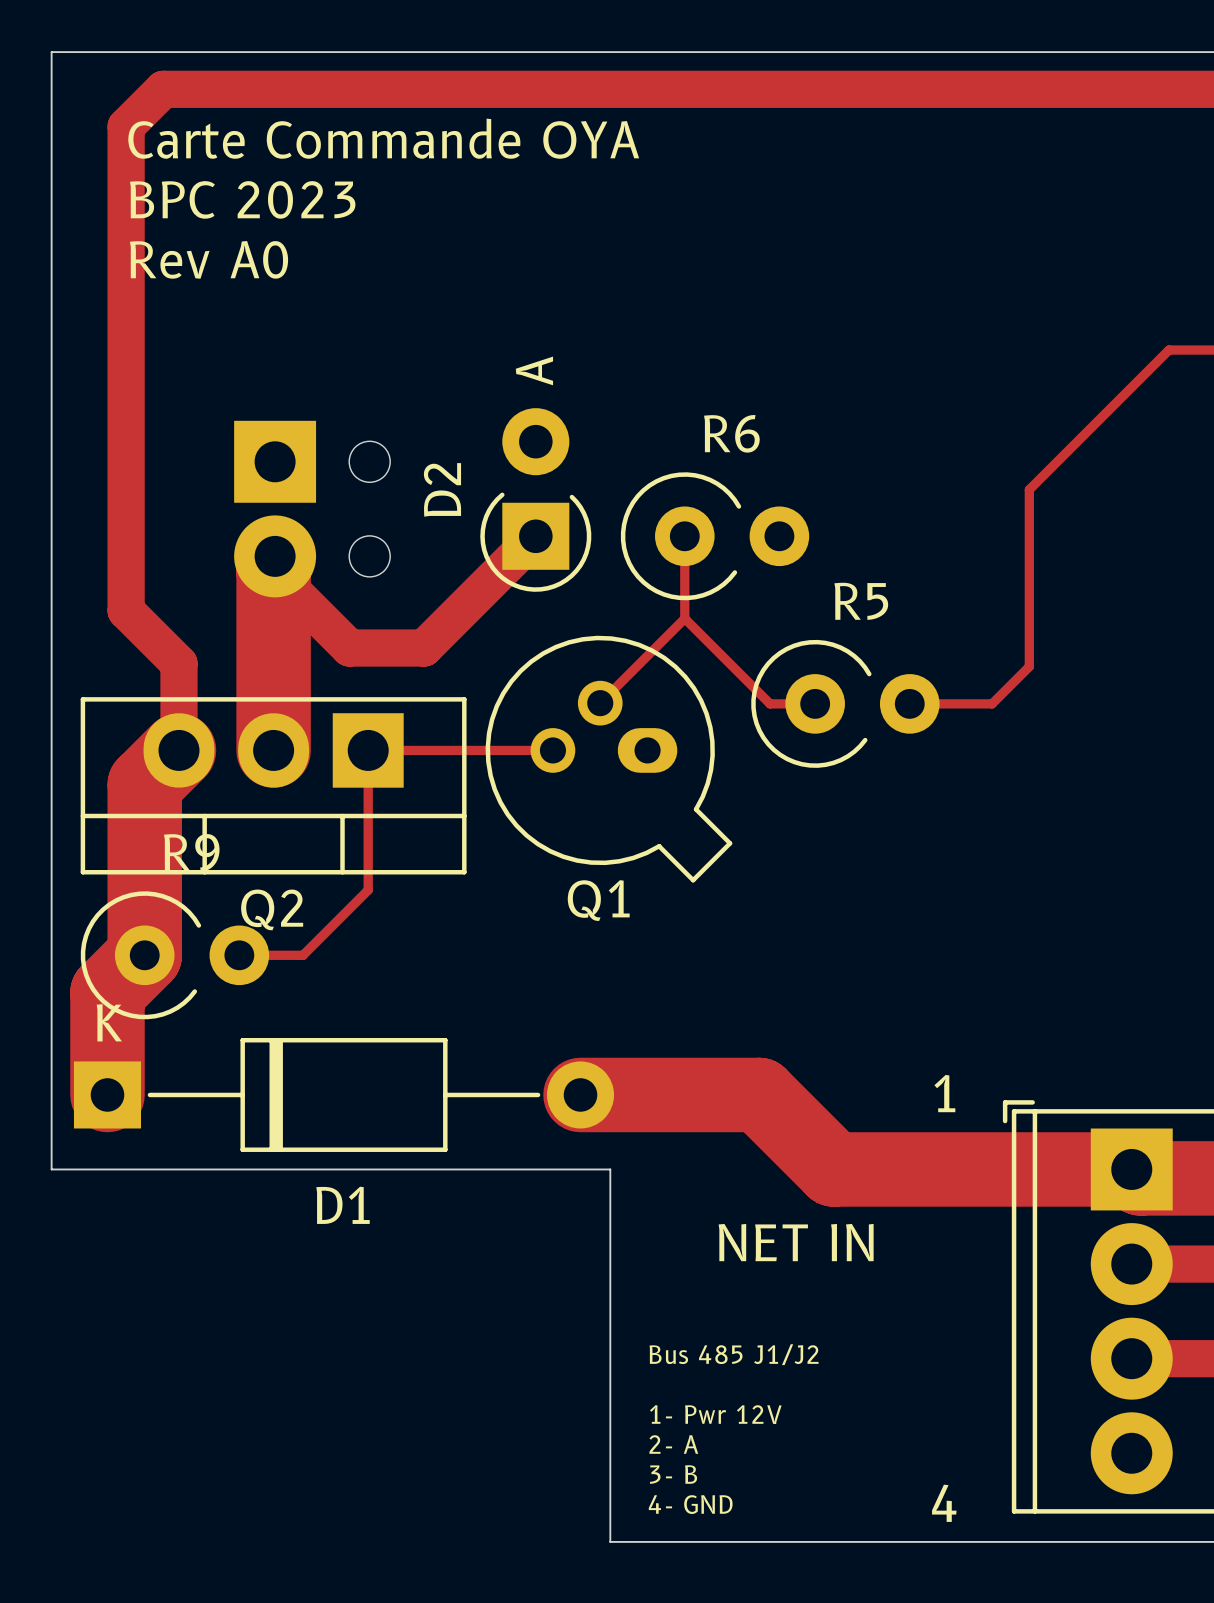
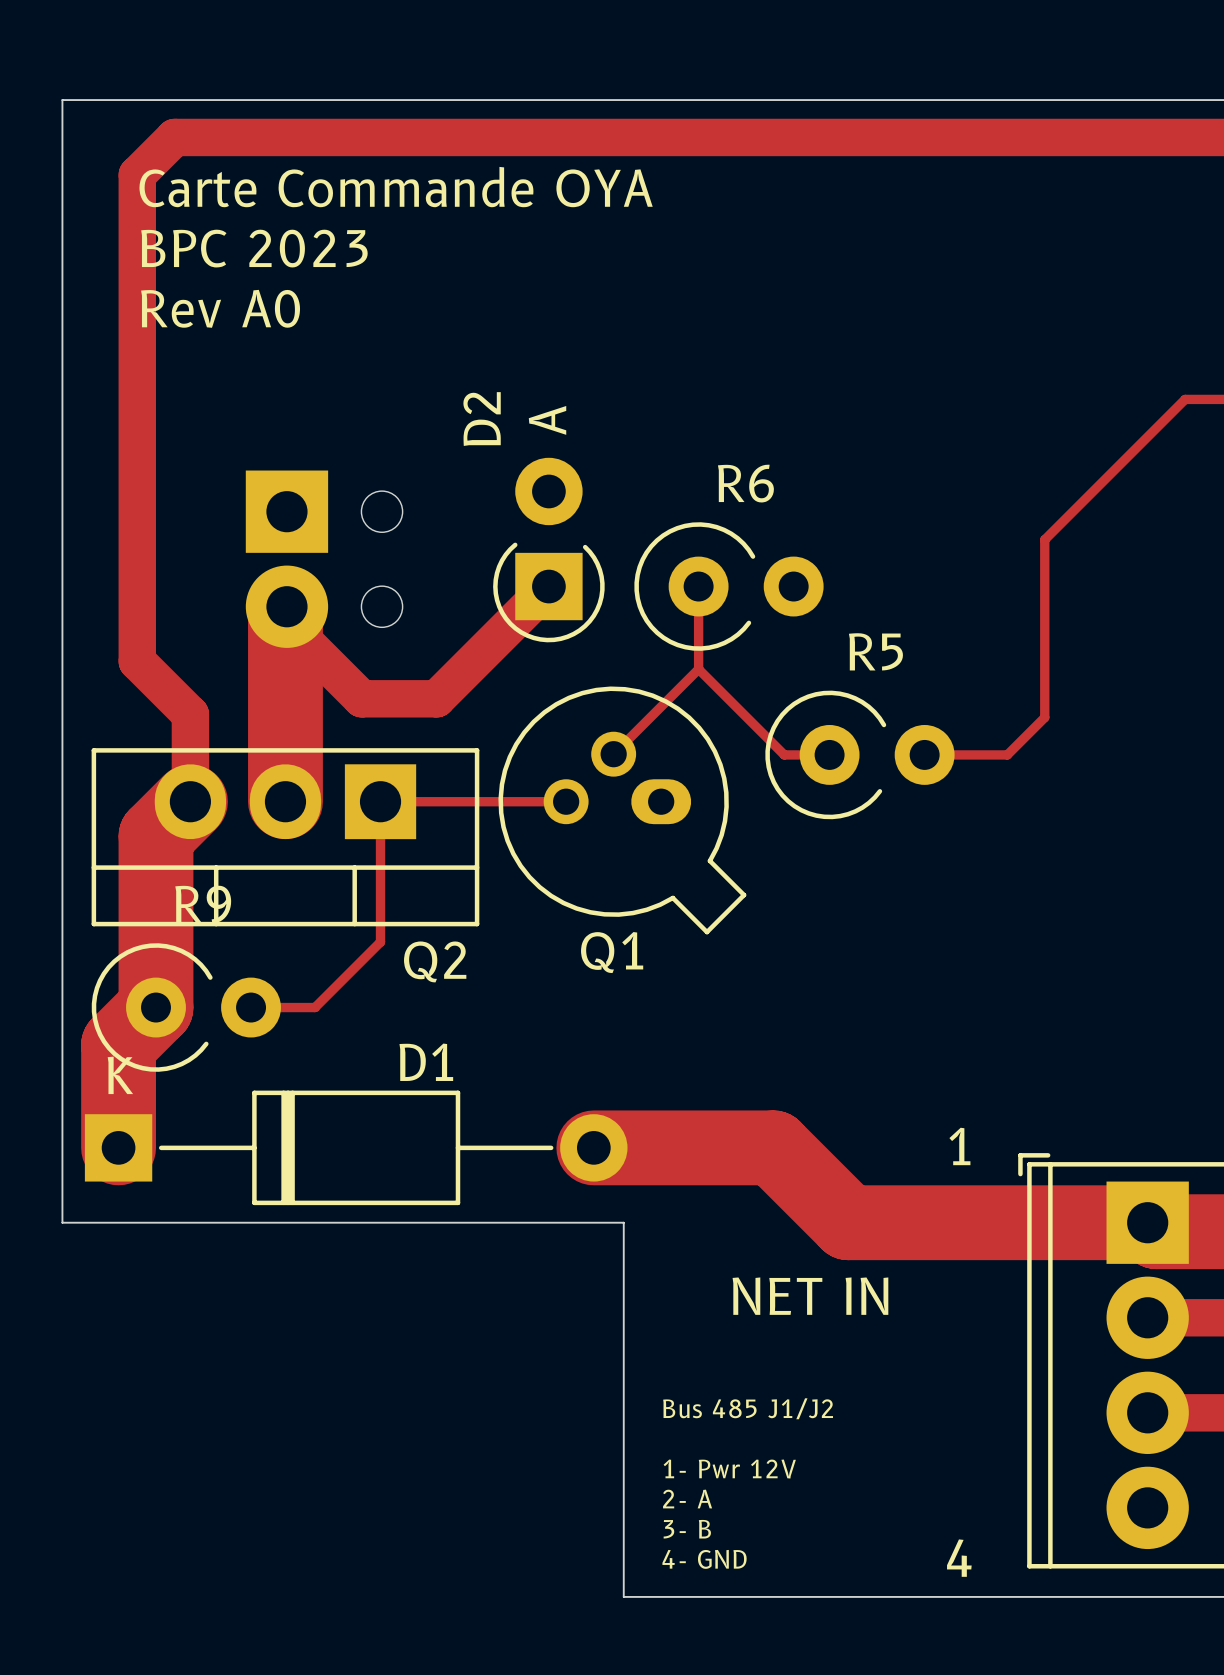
D2 name position: D2 (442, 489) -> D2 (482, 419)
Q2 name position: Q2 (272, 909) -> Q2 (435, 961)
D1 name position: D1 (343, 1205) -> D1 (426, 1062)

